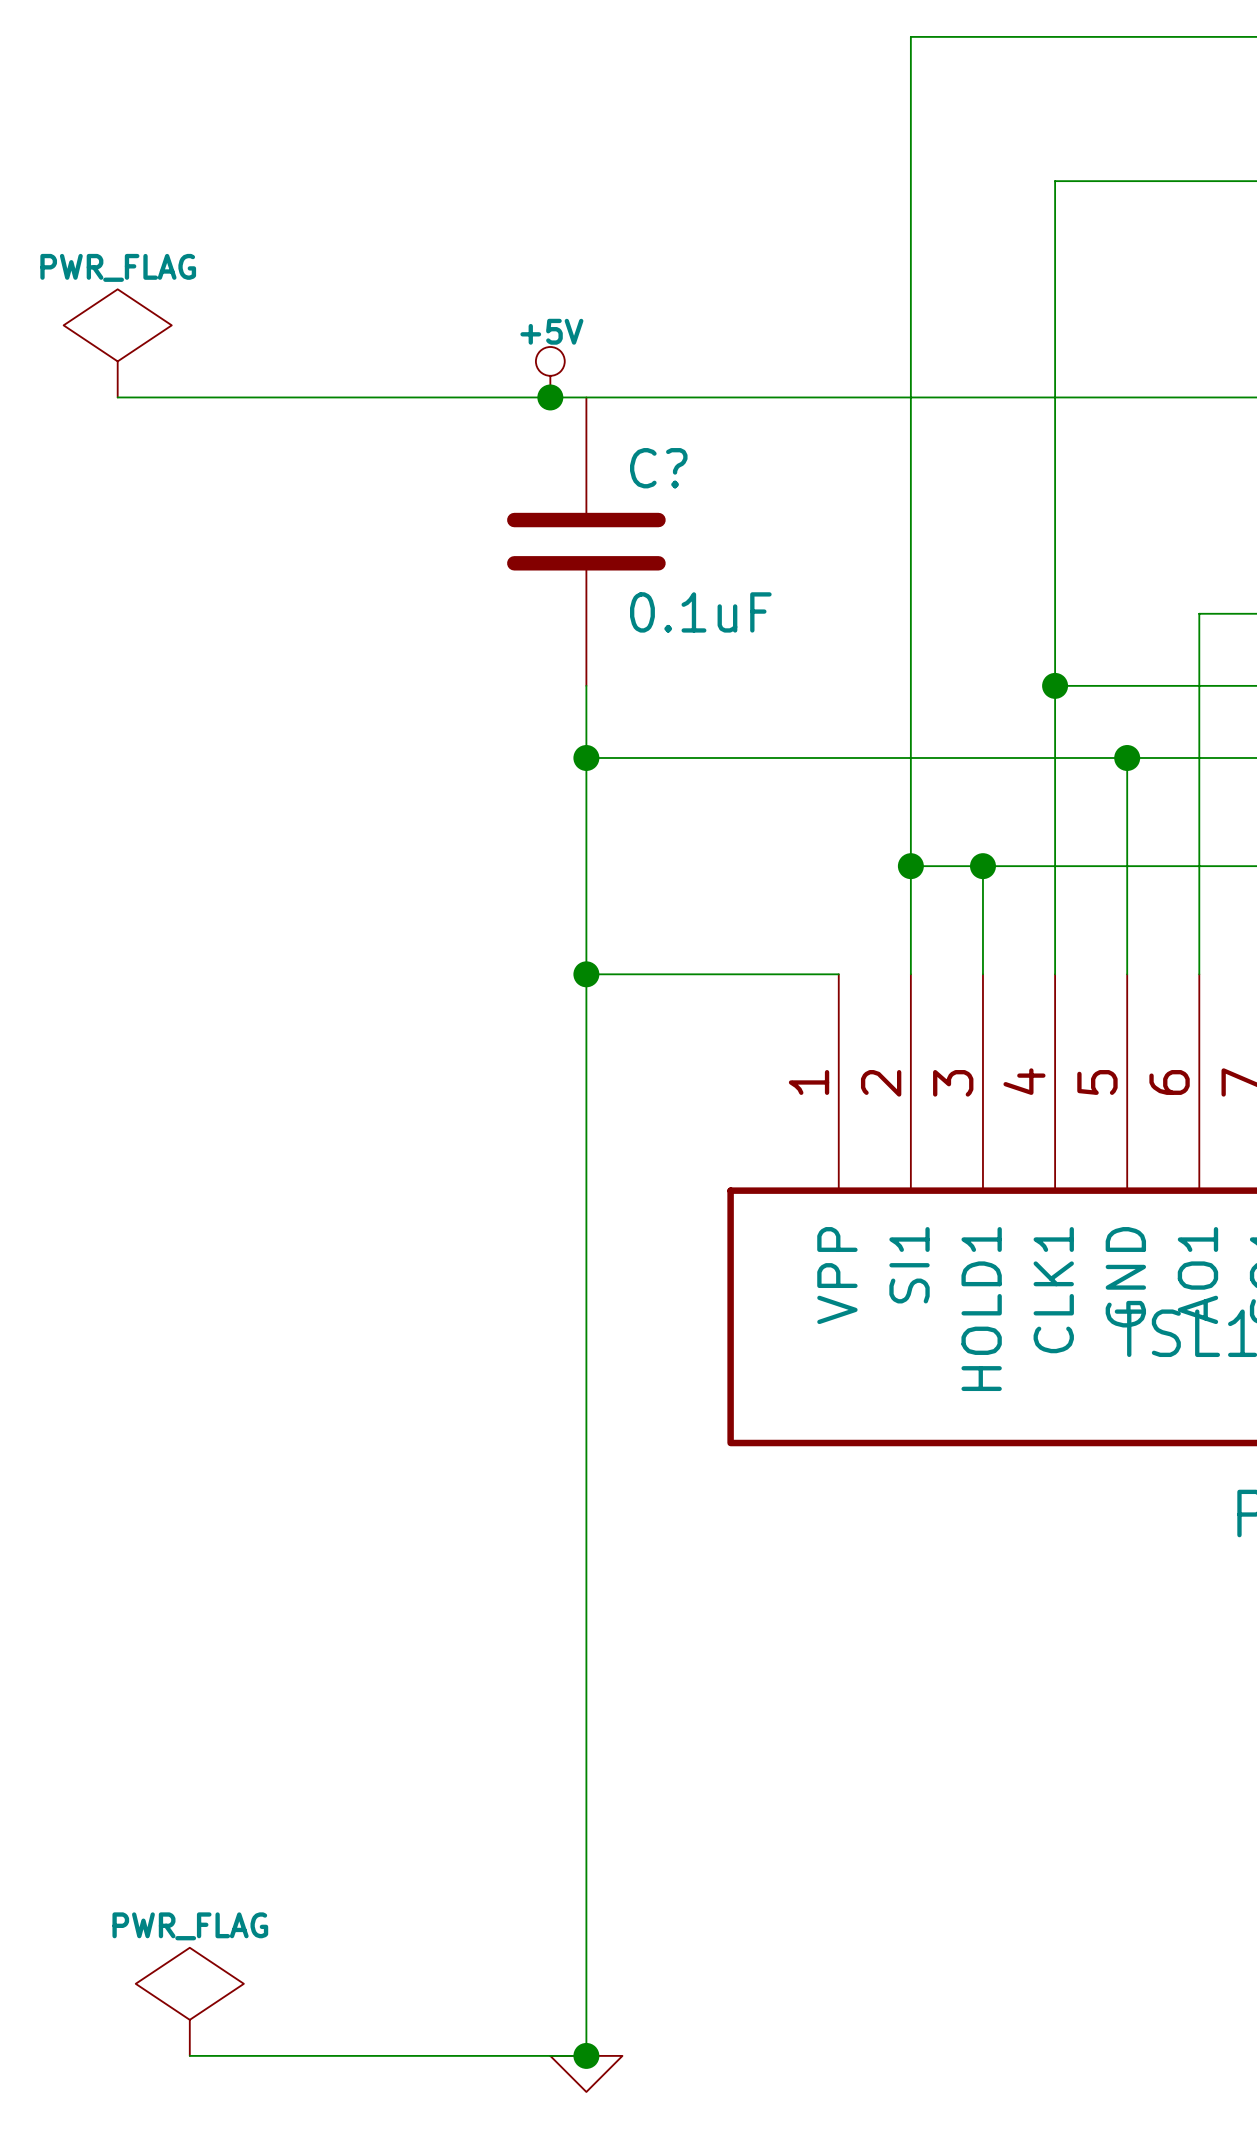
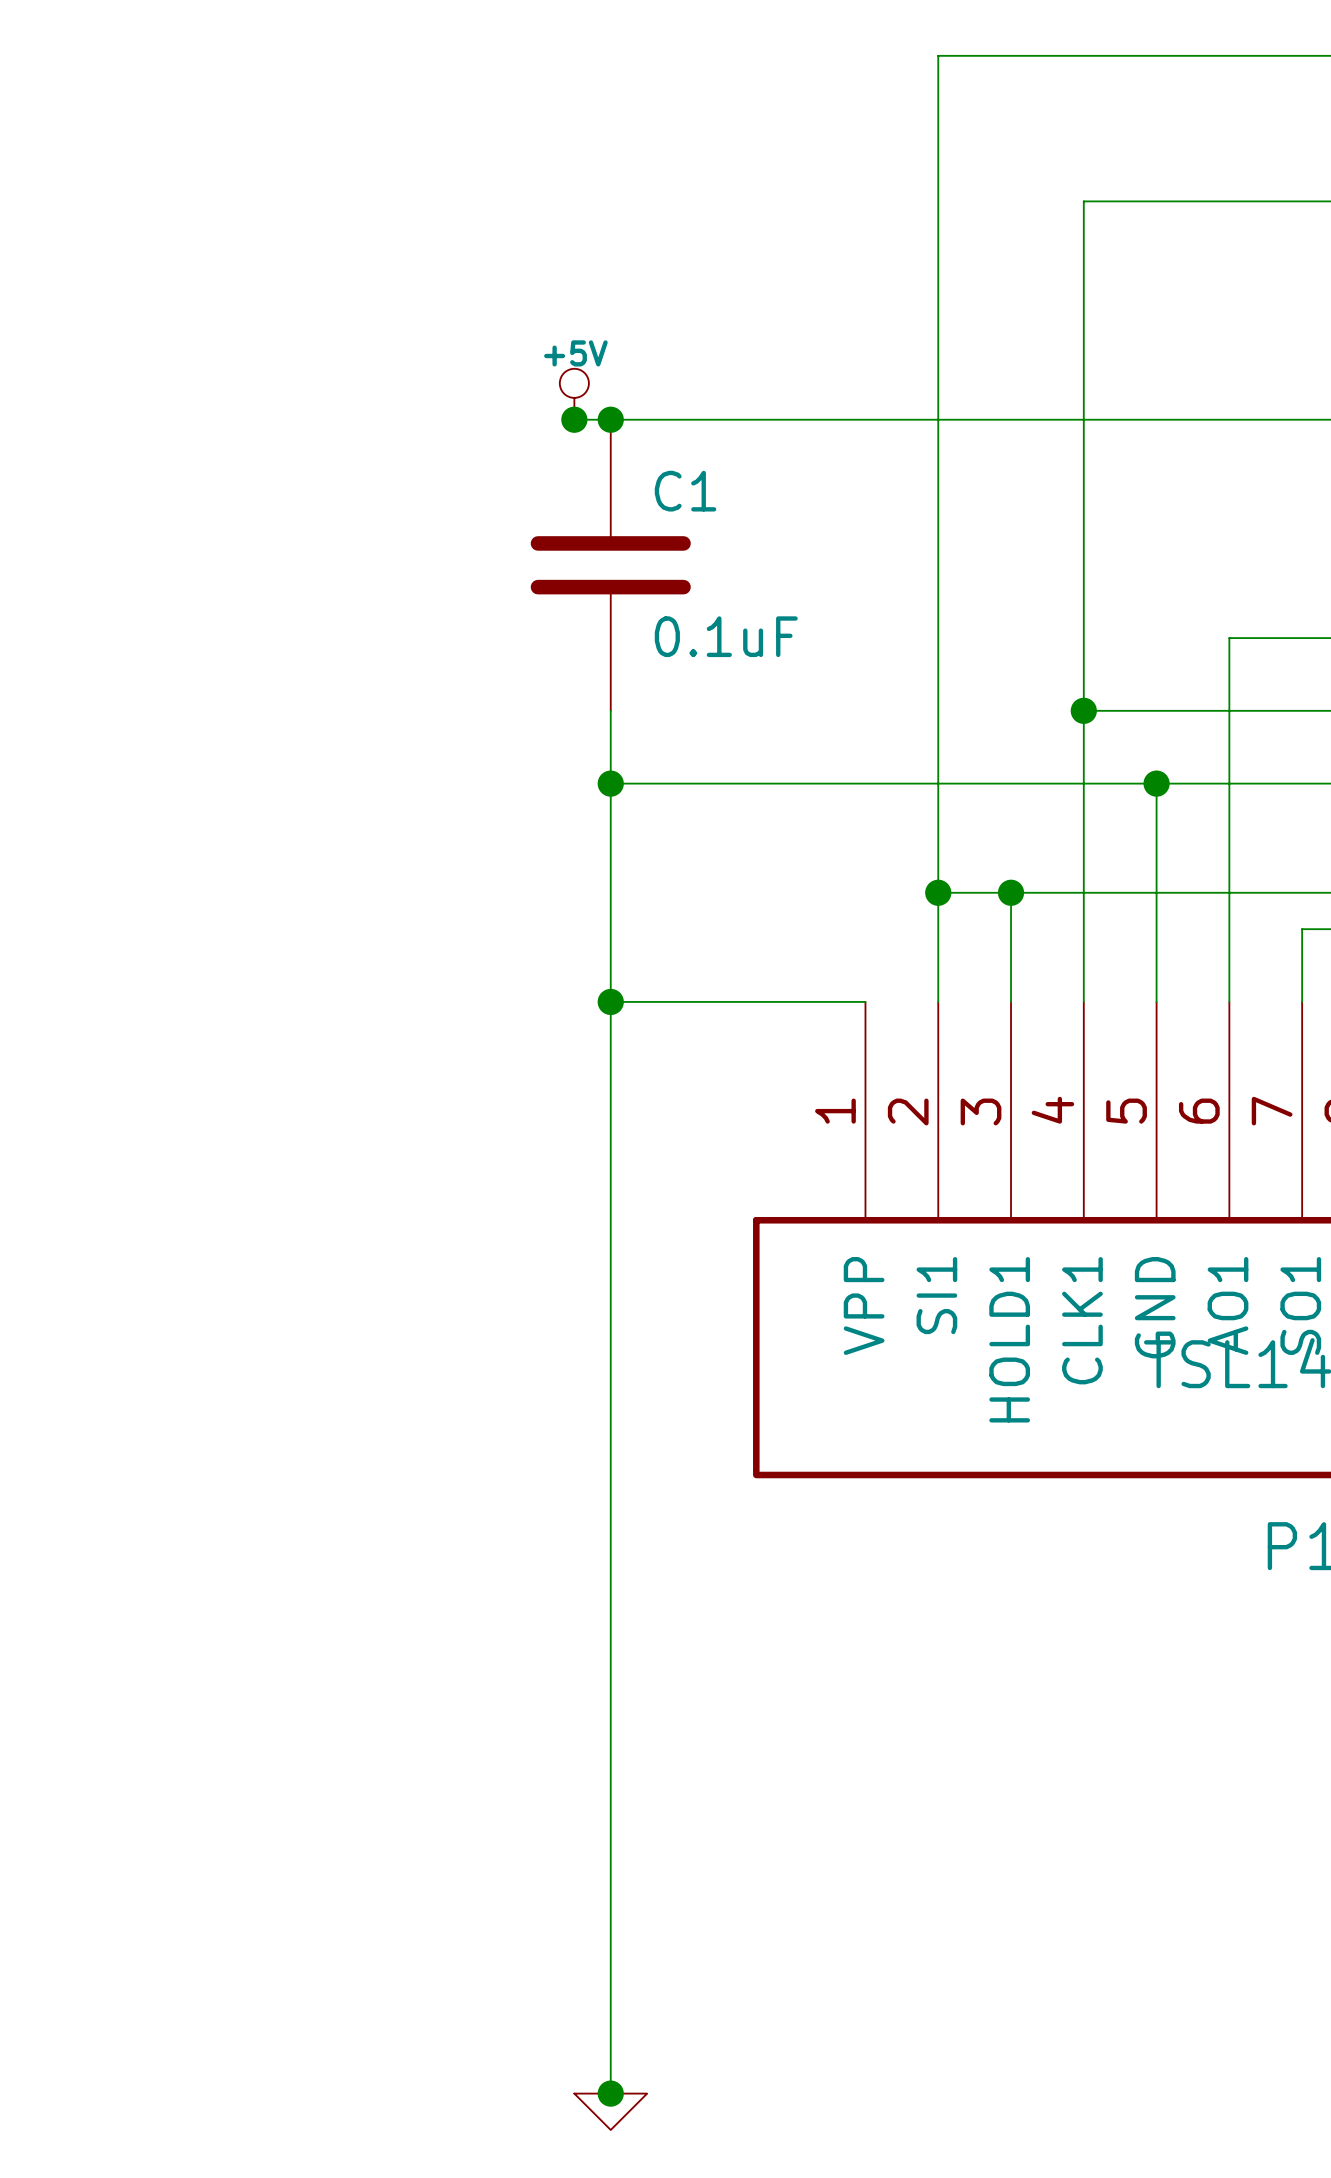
power symbol: PWR_FLAG (117, 343) -> none
wire: (117, 397) (550, 397) -> none
junction: none -> (610, 419)
C? name: C? (658, 468) -> C1 (685, 491)
power symbol: PWR_FLAG (189, 2001) -> none
wire: (189, 2055) (586, 2055) -> none

